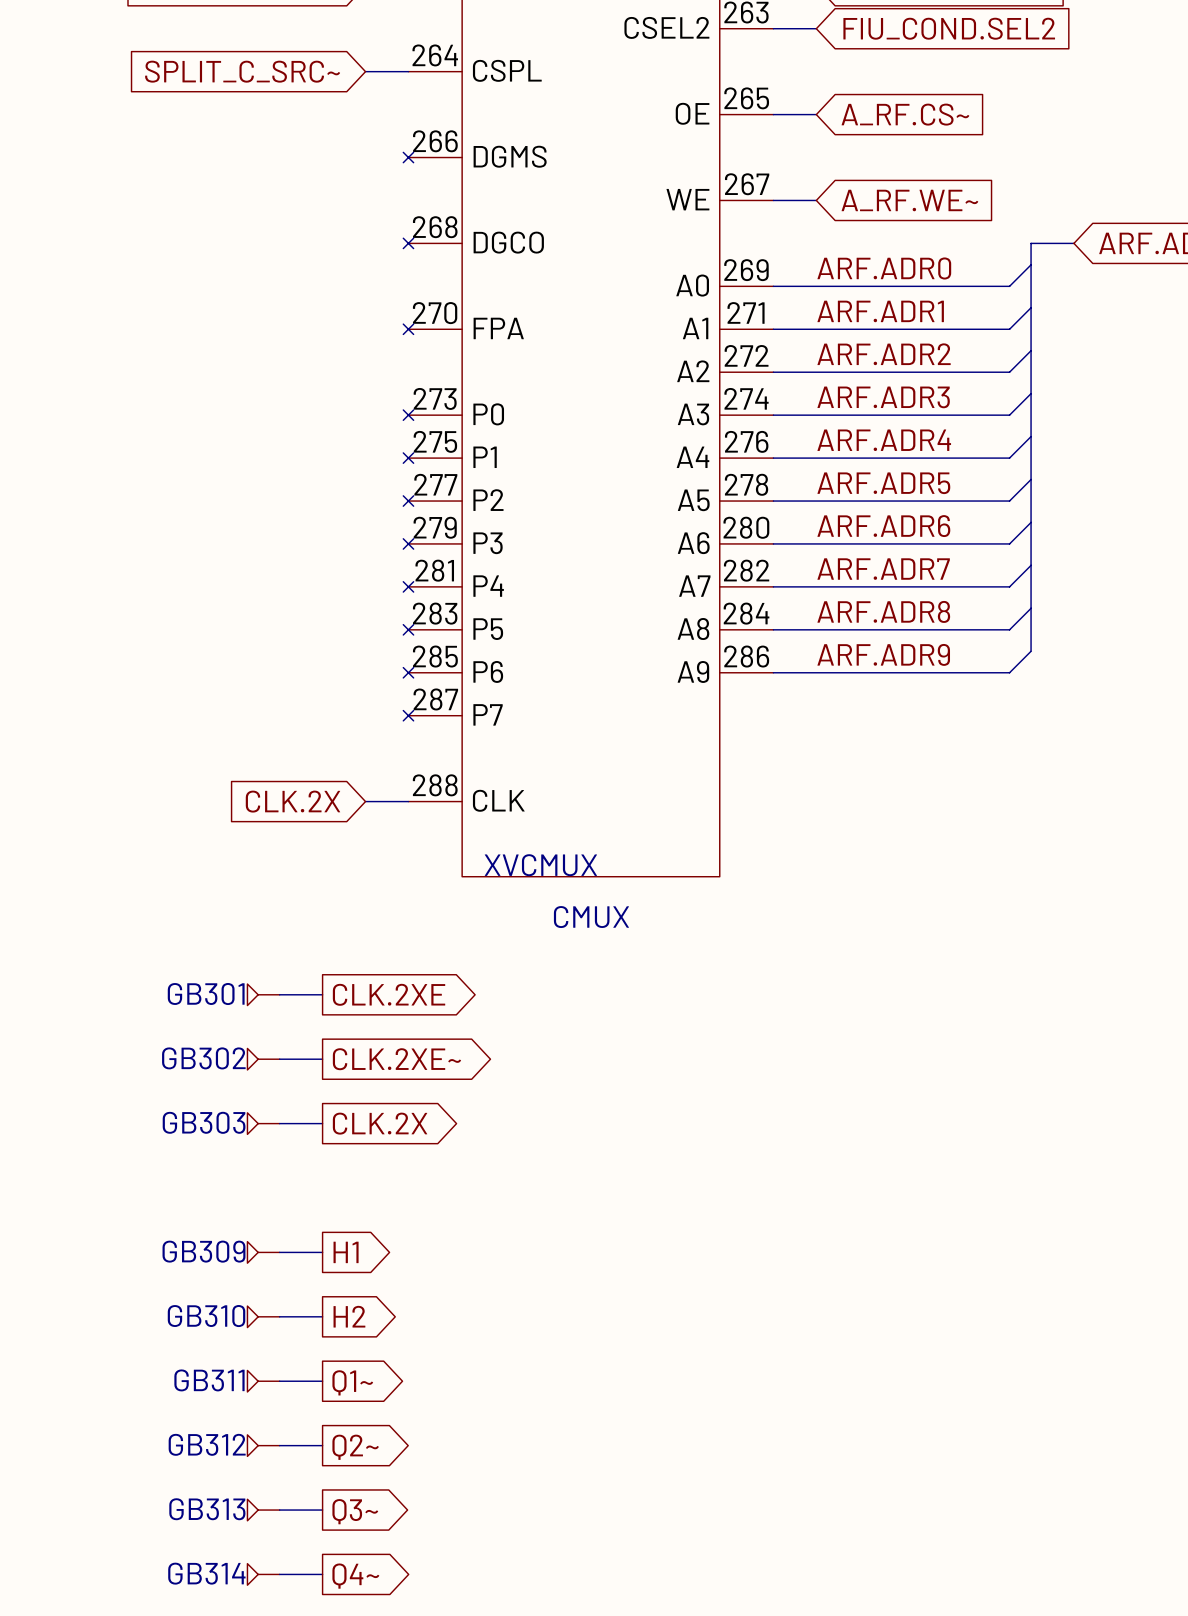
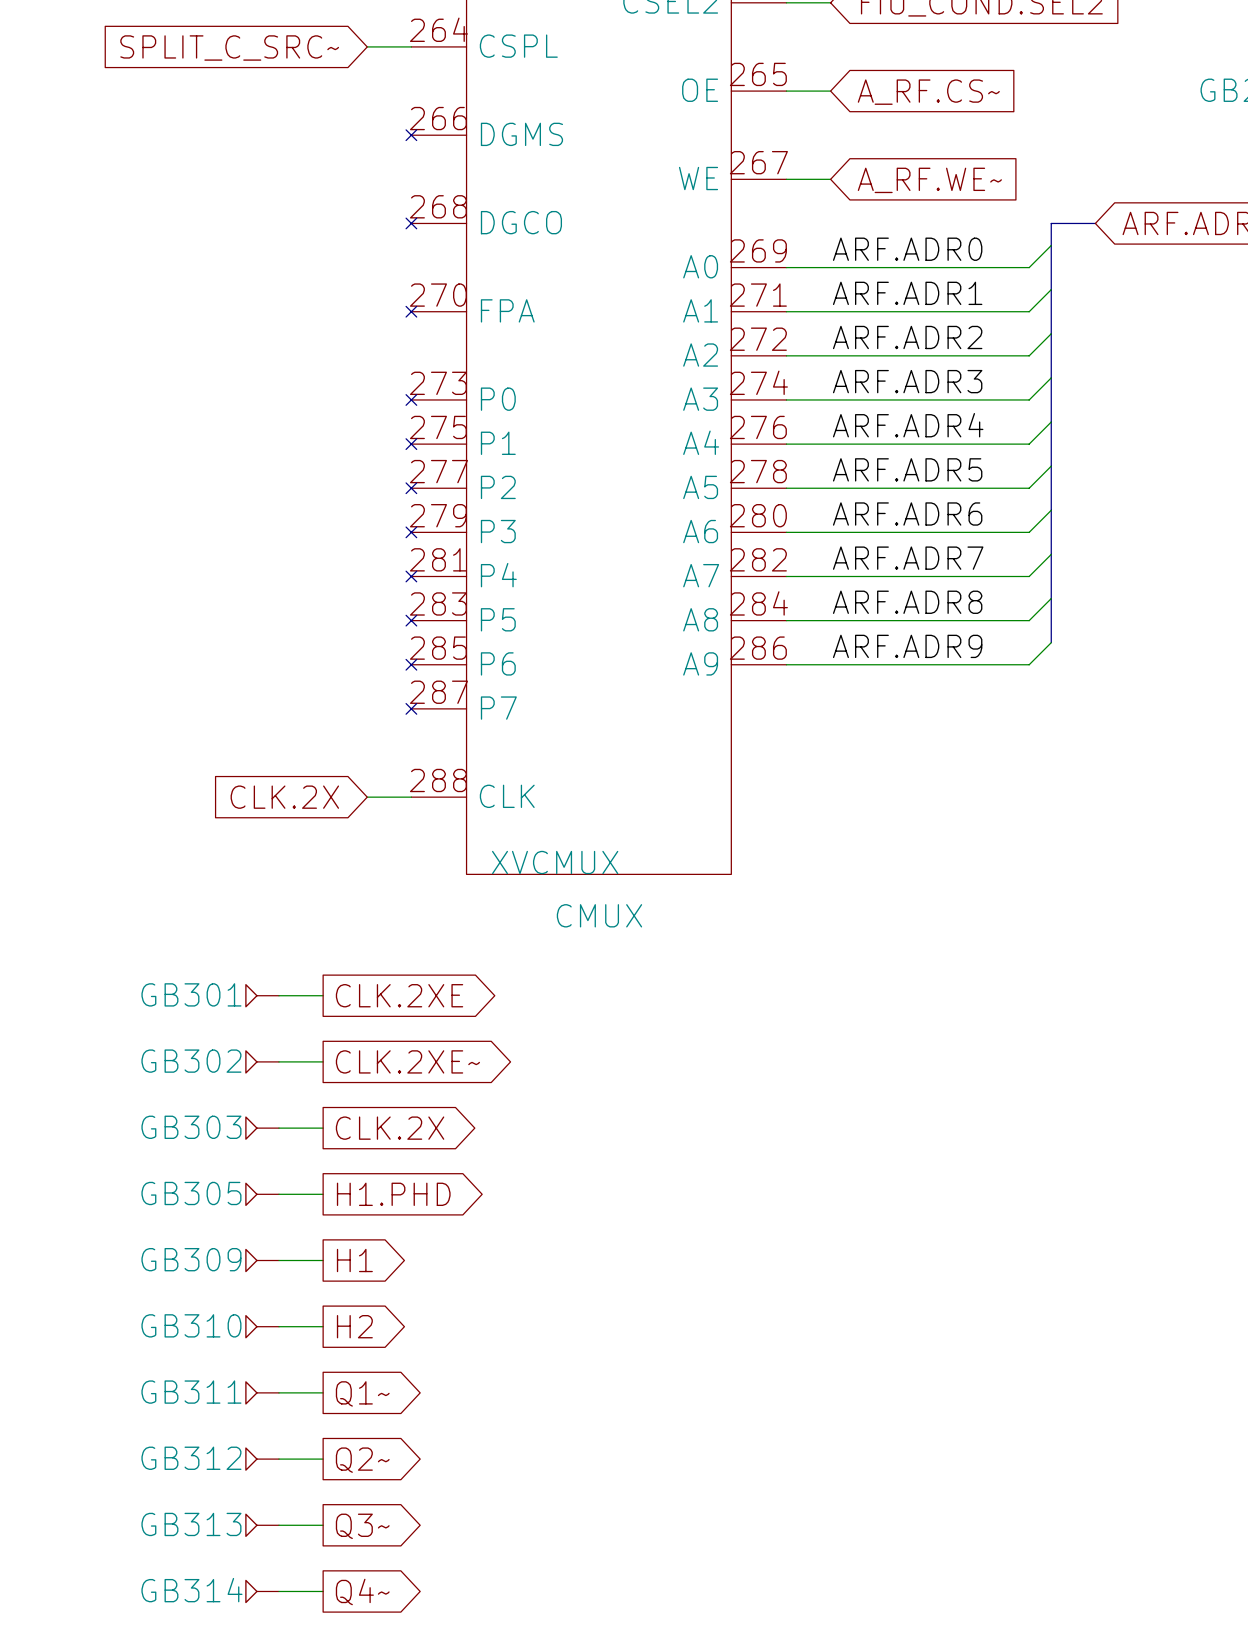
GB305: none -> (262, 1194)
wire: none -> (279, 1194) (323, 1194)
global label: none -> H1.PHD (393, 1194)

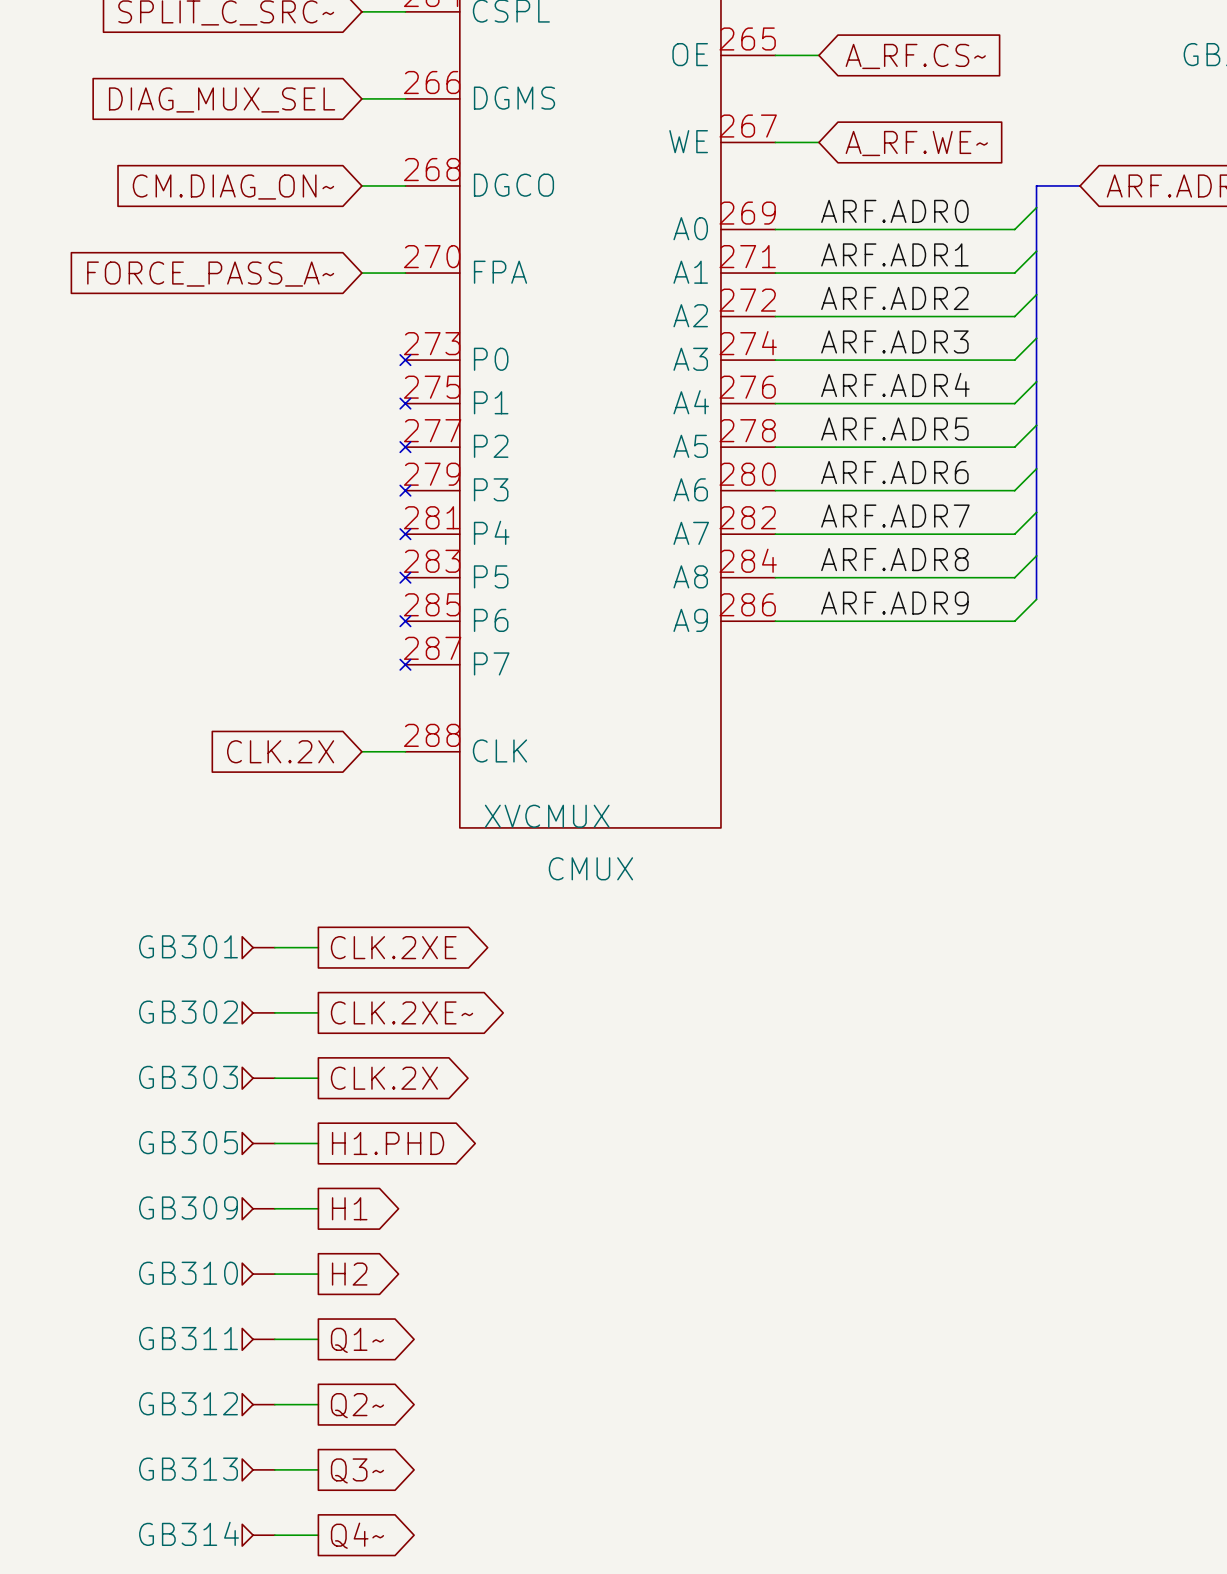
wire: none -> (361, 98) (405, 98)
no-connect mark: (411, 135) -> none
global label: none -> DIAG_MUX_SEL (222, 99)
wire: none -> (361, 185) (405, 185)
no-connect mark: (411, 223) -> none
global label: none -> CM.DIAG_ON~ (233, 187)
wire: none -> (361, 273) (405, 273)
no-connect mark: (411, 311) -> none
global label: none -> FORCE_PASS_A~ (210, 274)

